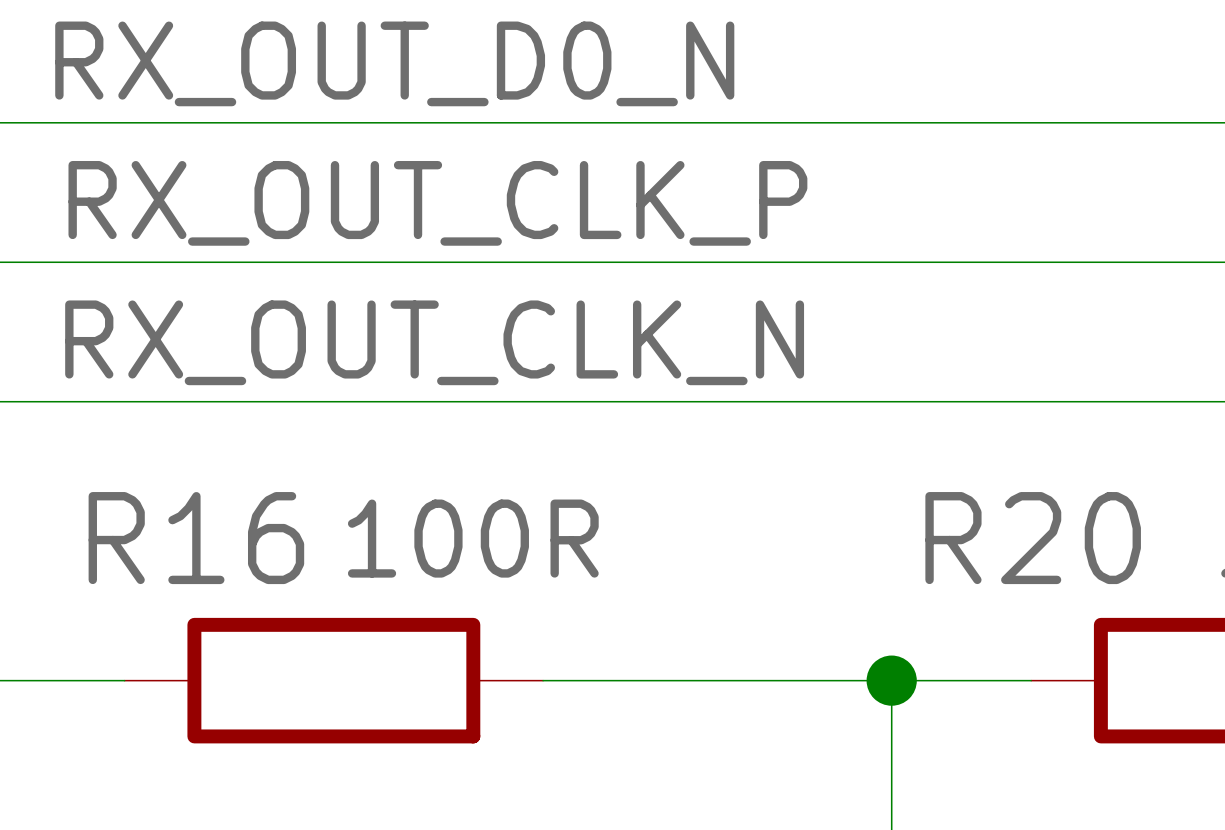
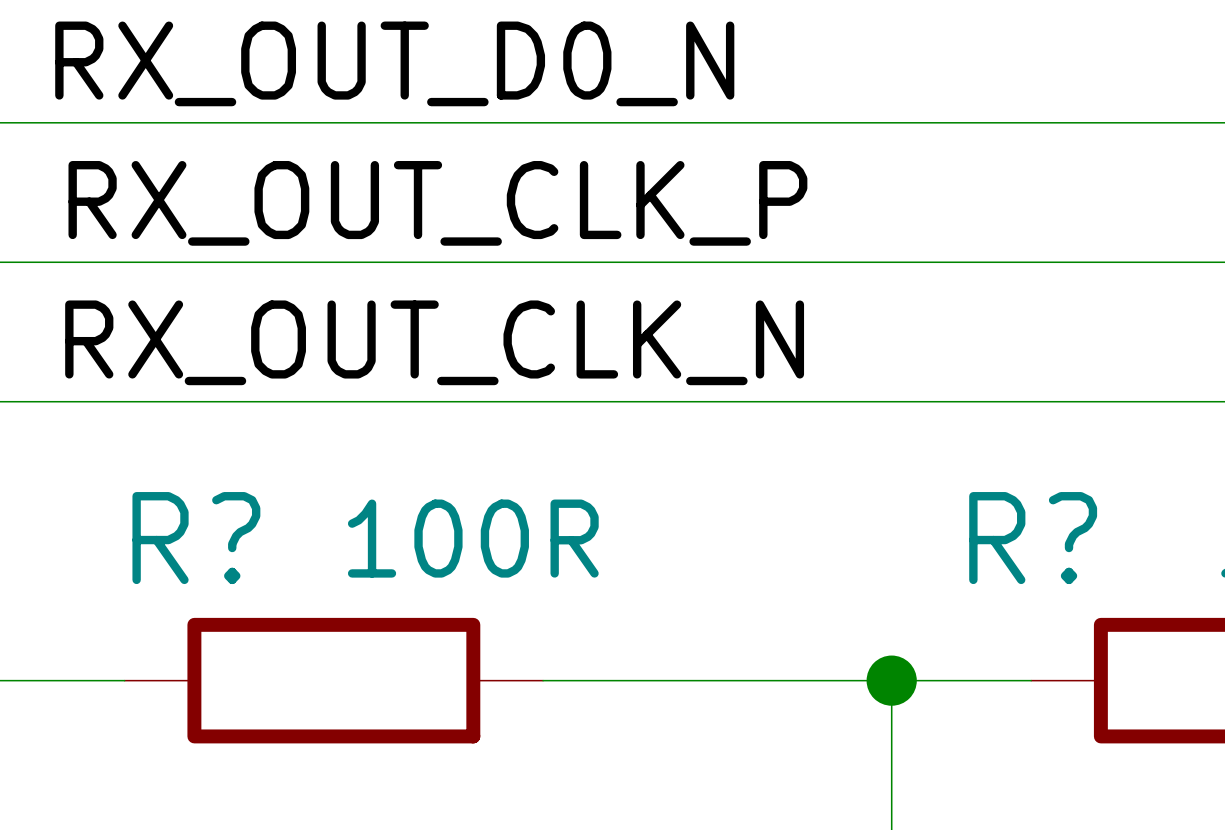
R16 name: R16 (196, 538) -> R? (196, 538)
R20 name: R20 (1033, 538) -> R? (1033, 538)

